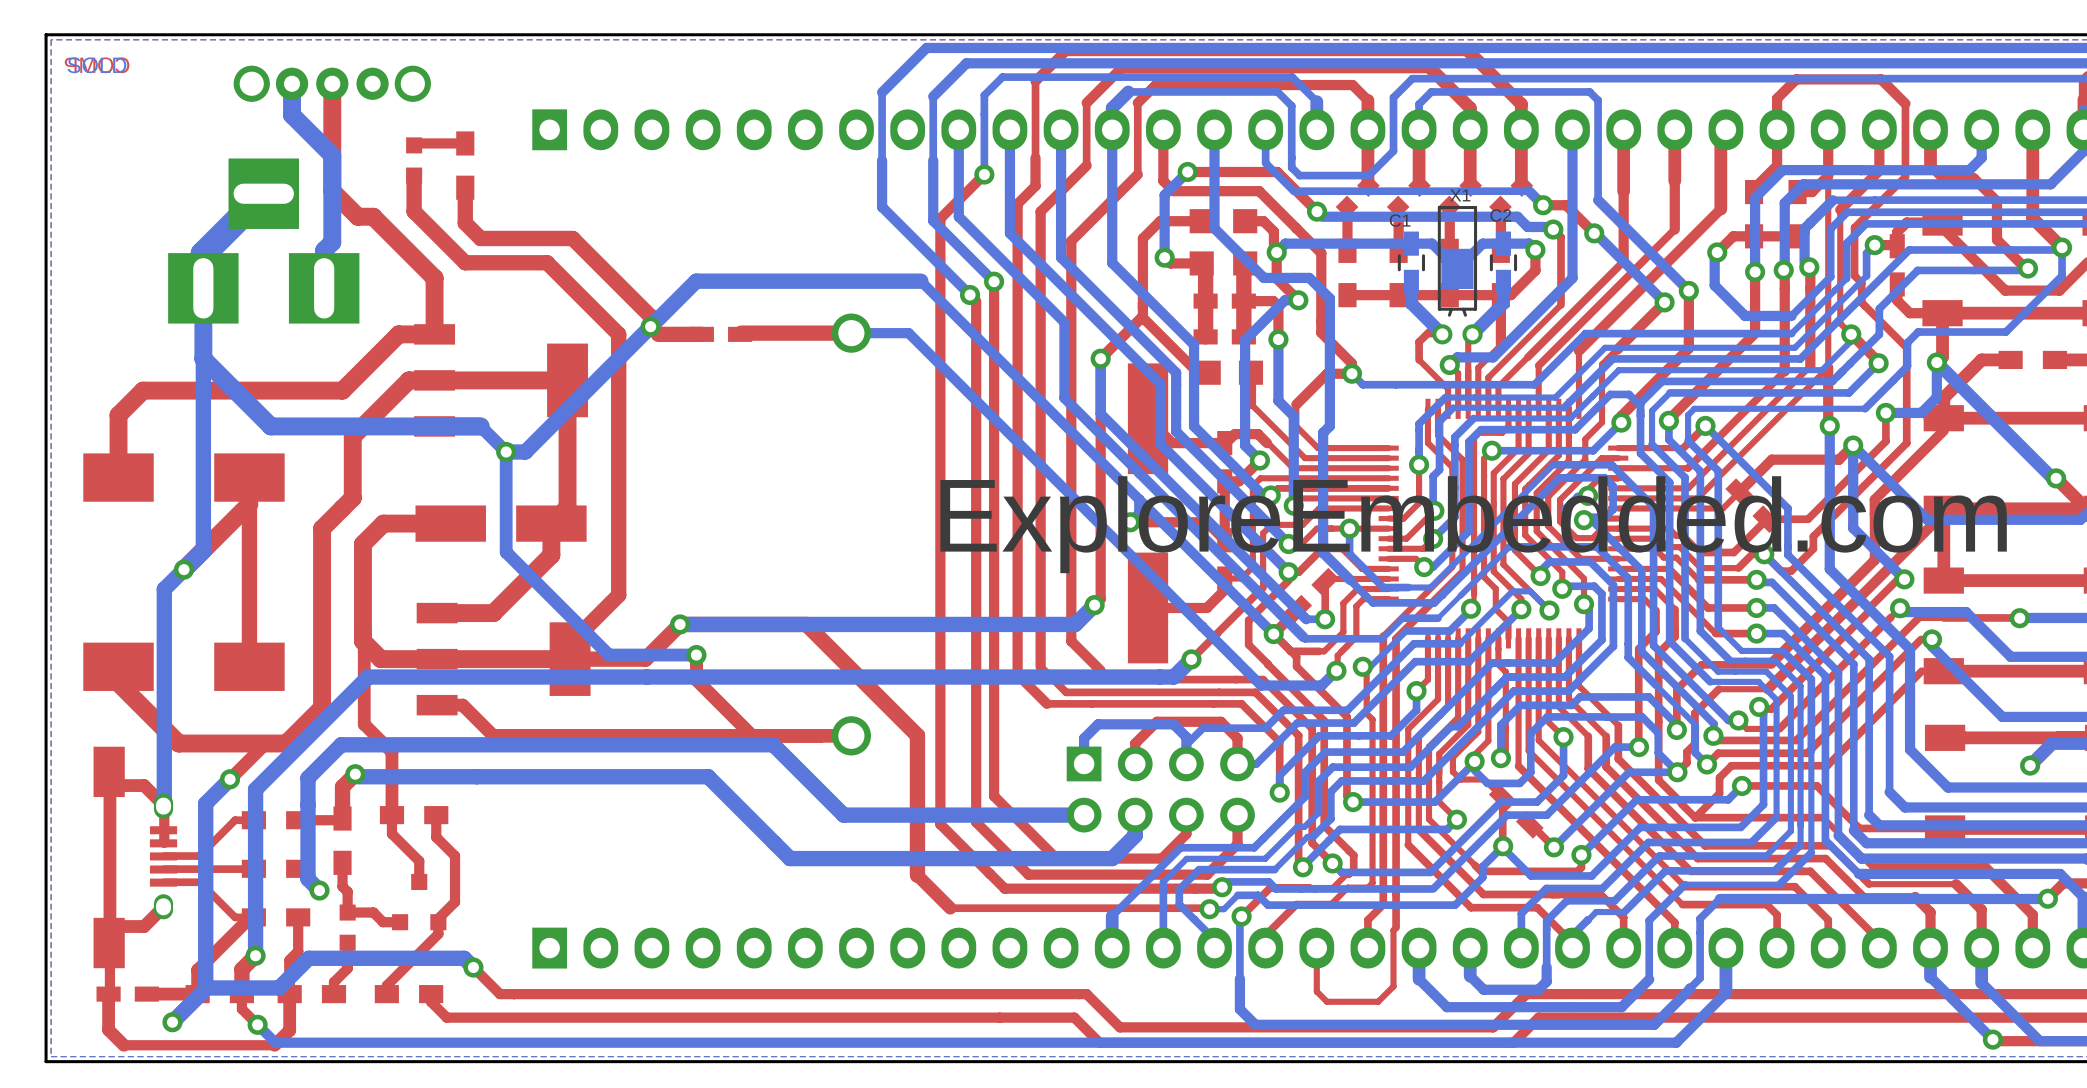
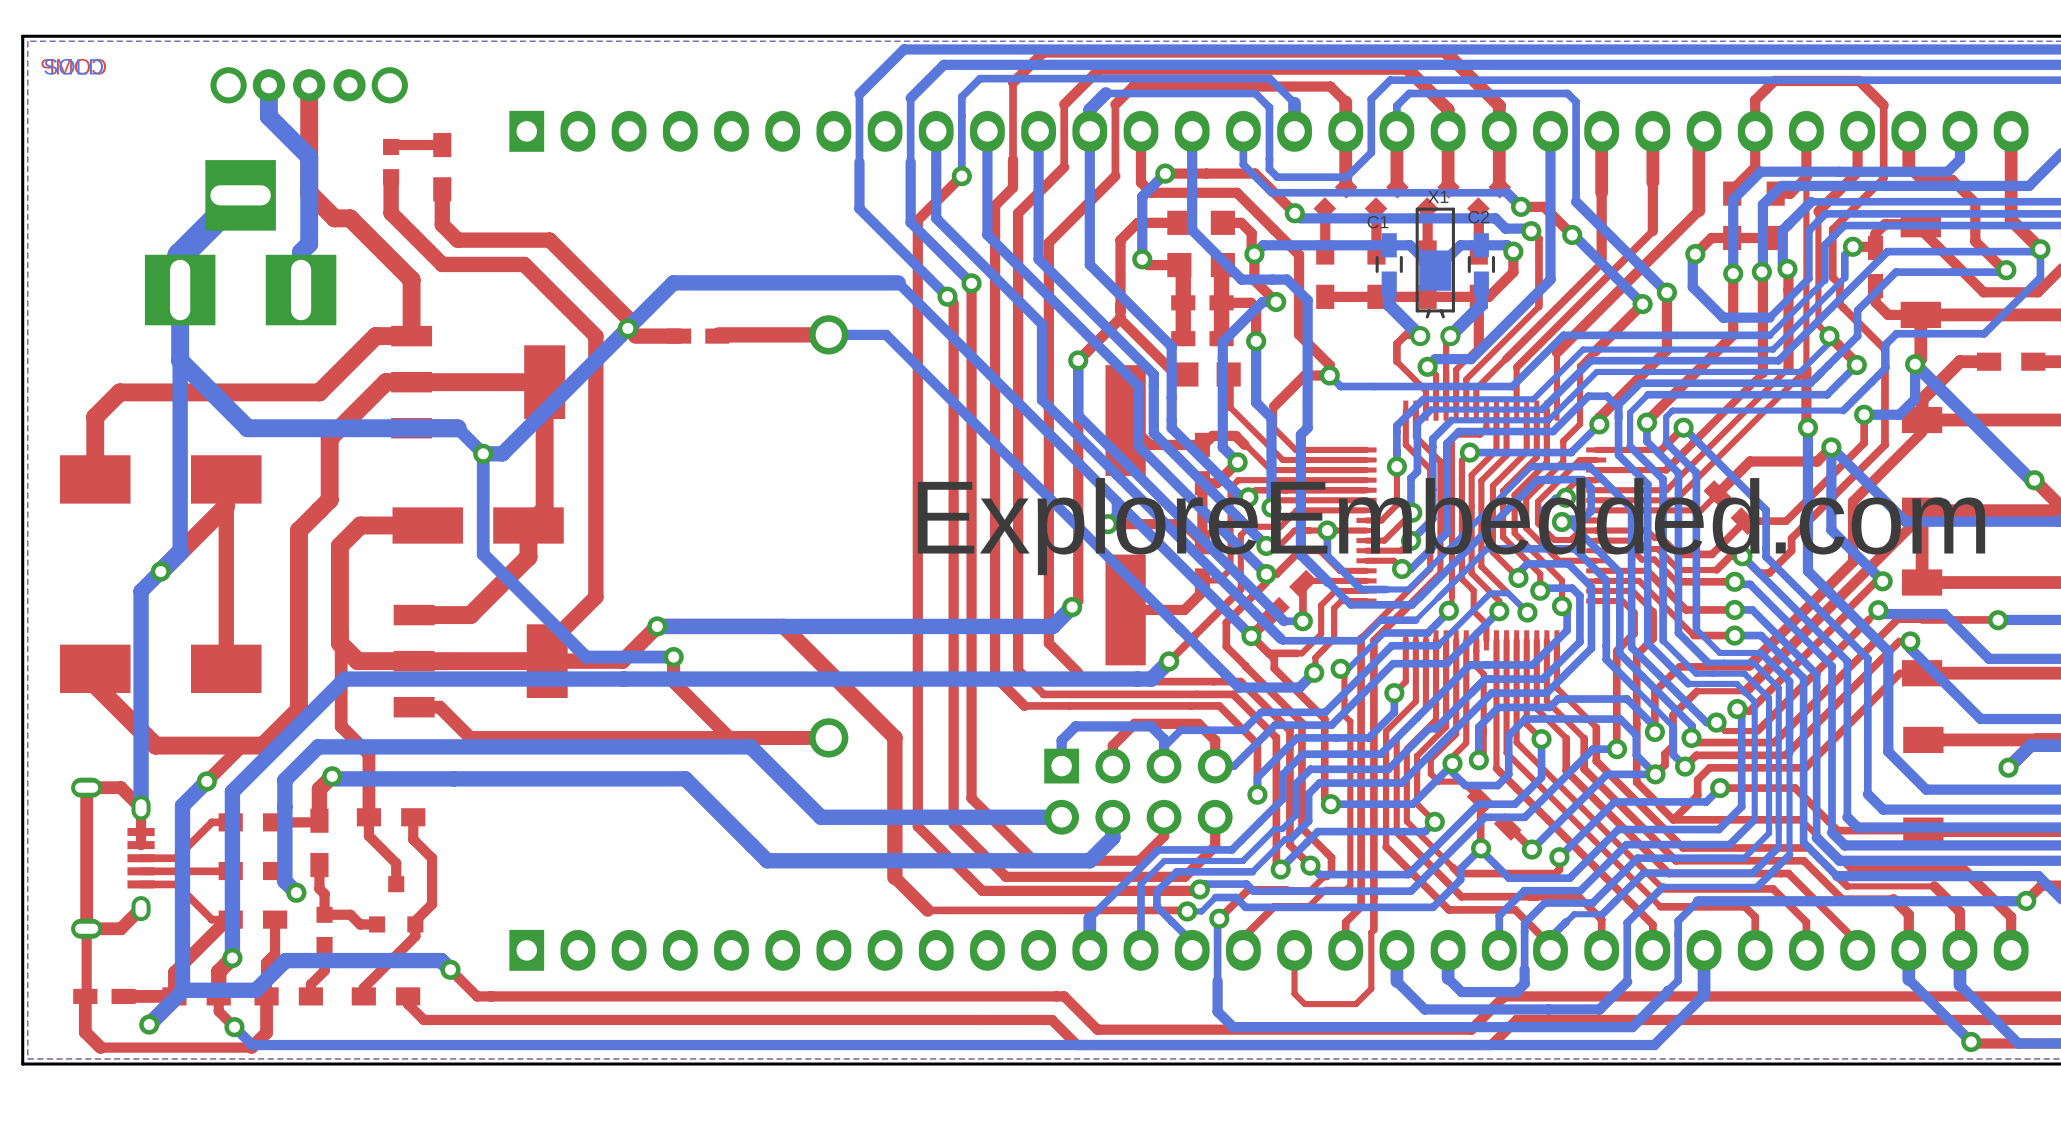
part footprint: [93, 746, 178, 969] -> [71, 777, 155, 939]

